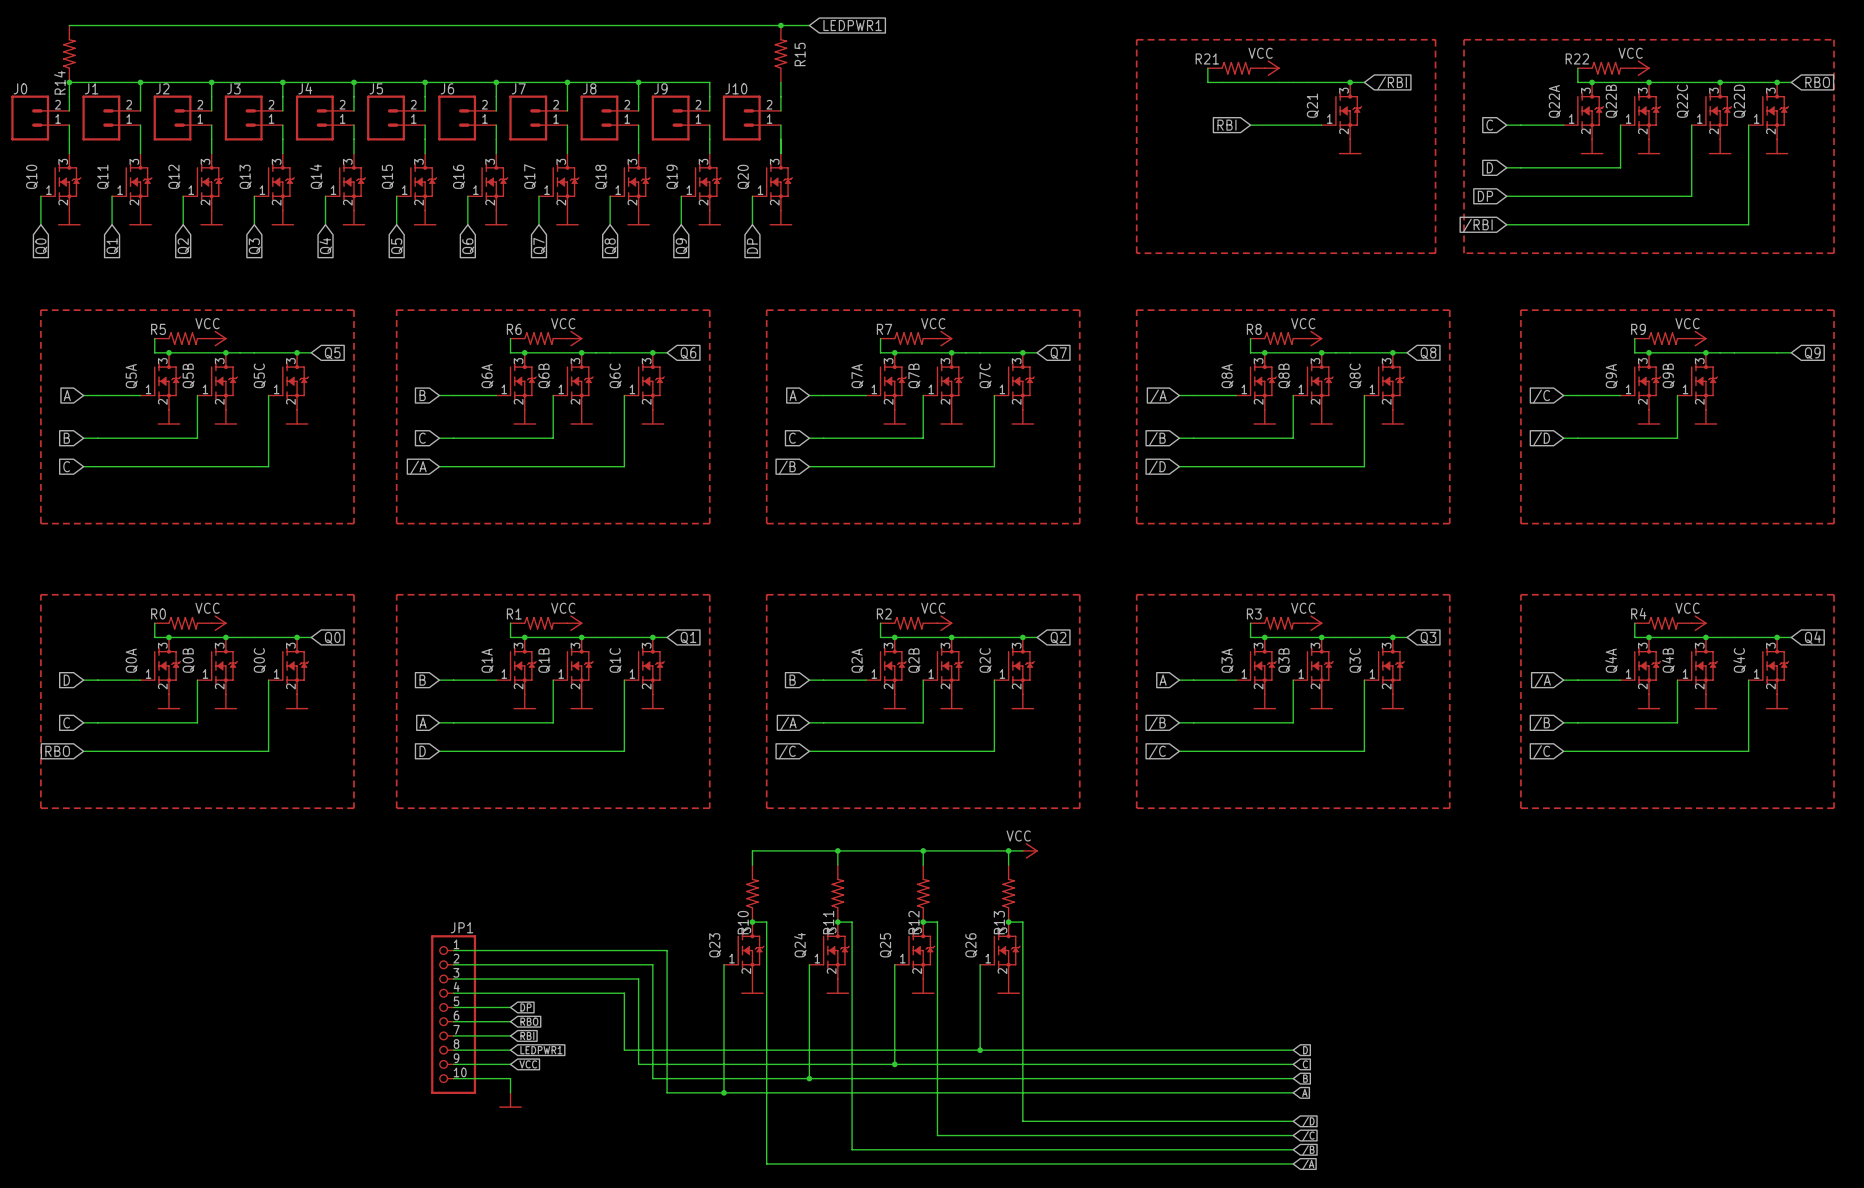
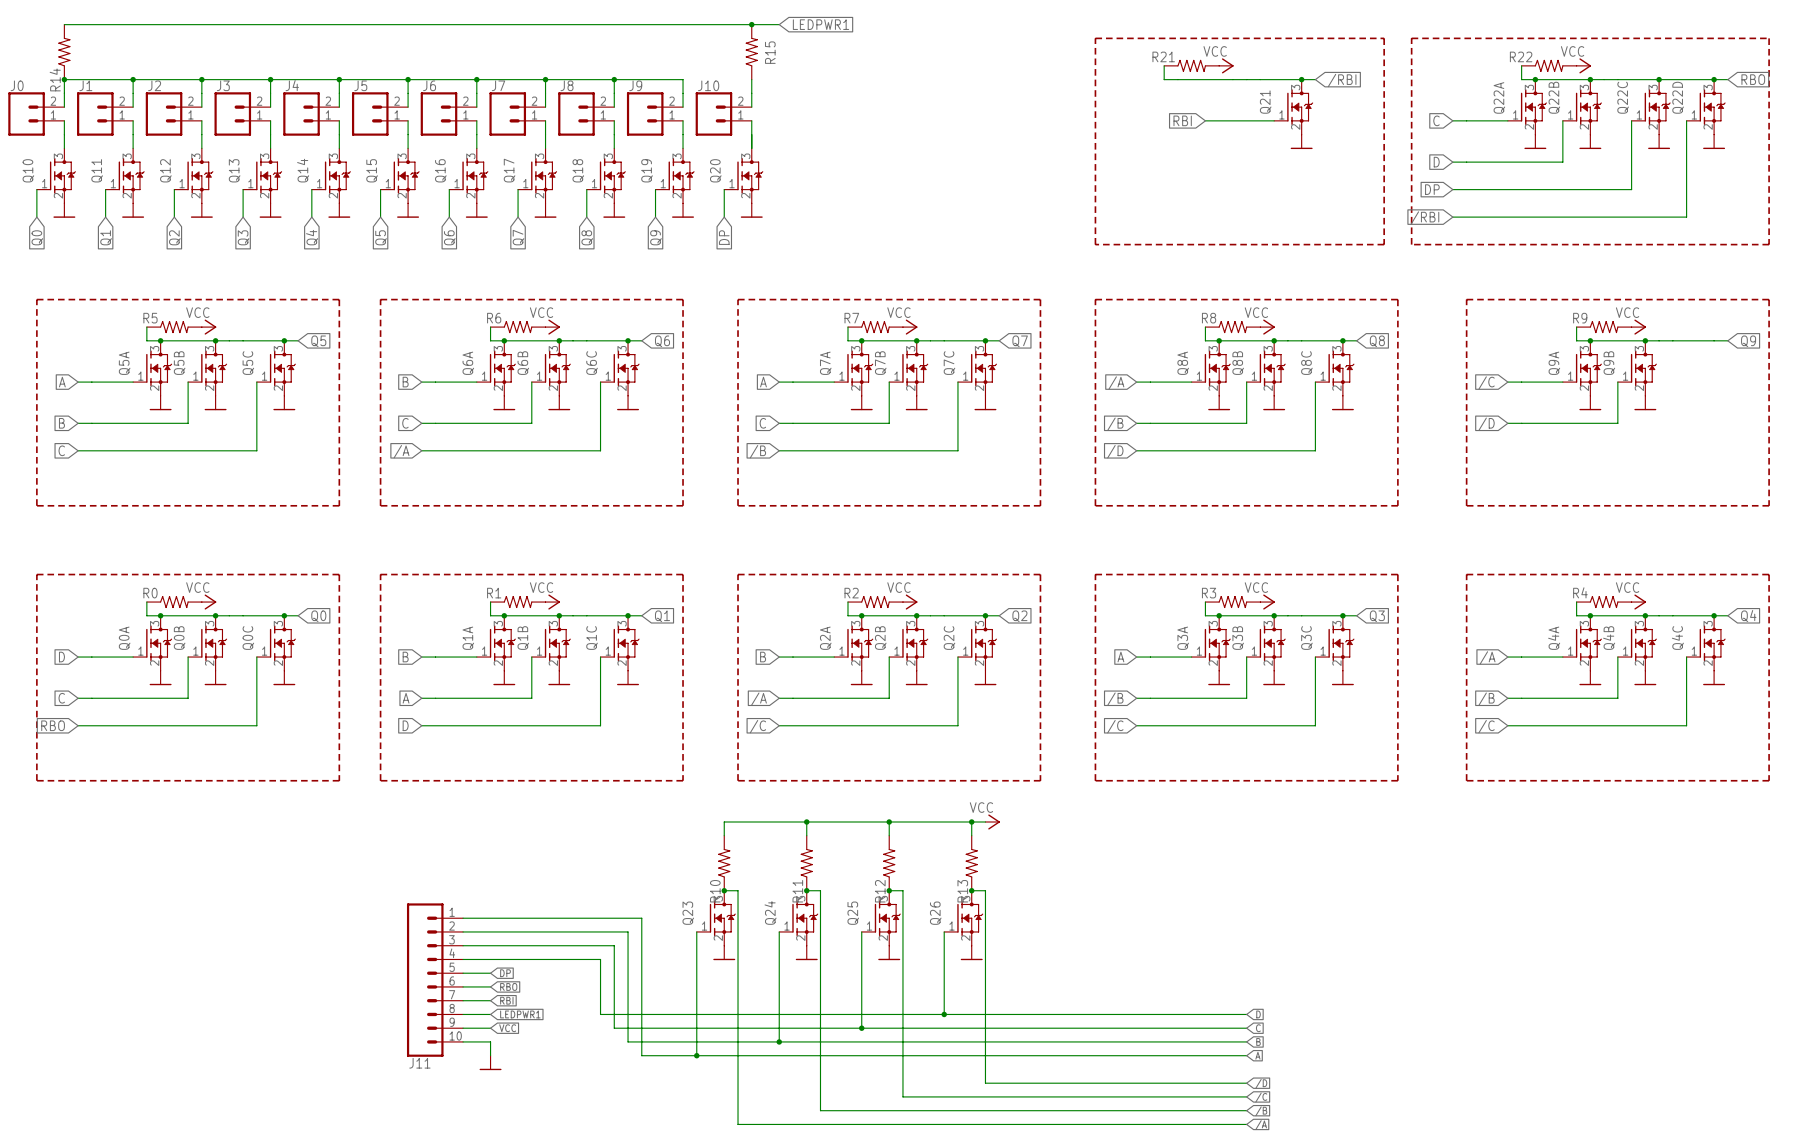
JP1: (453, 1014) -> none
J11: none -> (435, 980)

